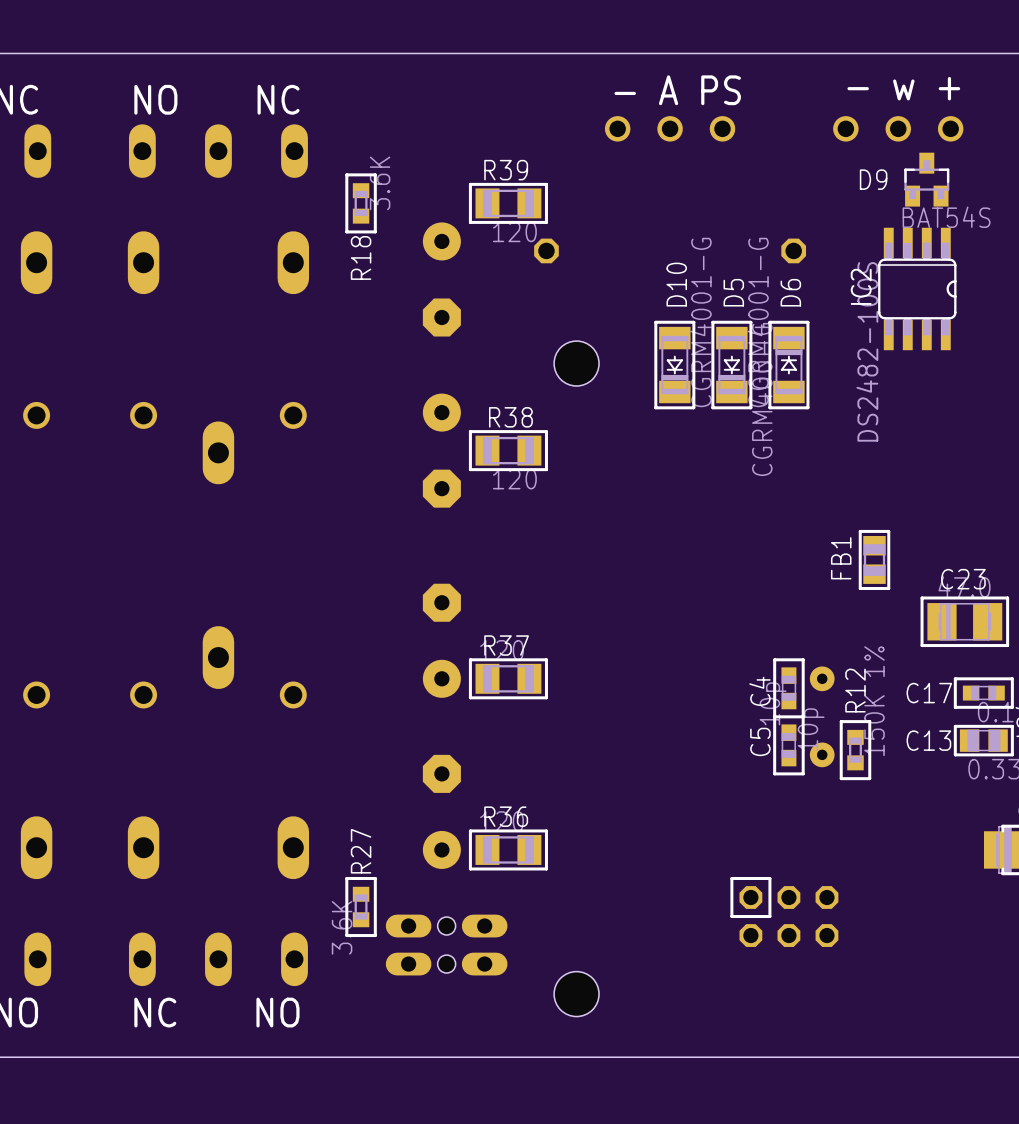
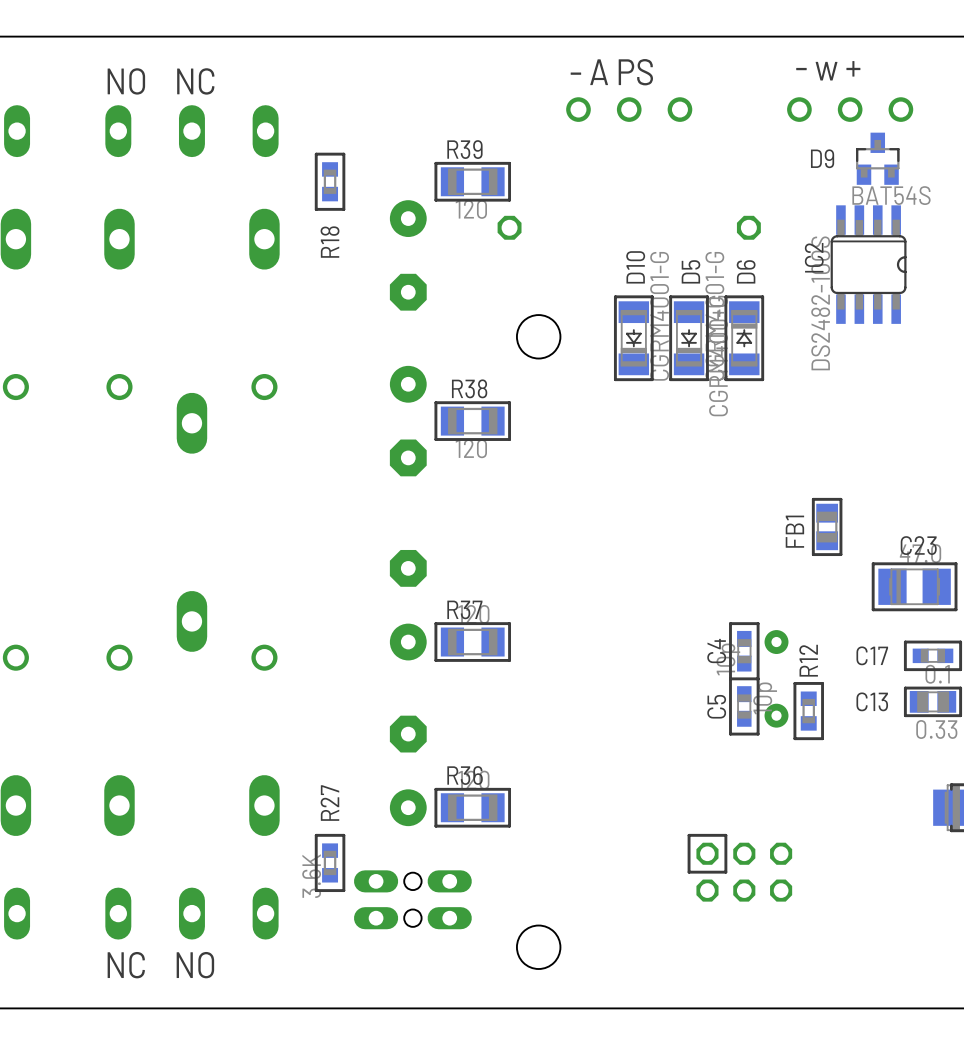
R18 value: 3.6K (380, 183) -> none
R12 value: 150K 1% (874, 701) -> none

